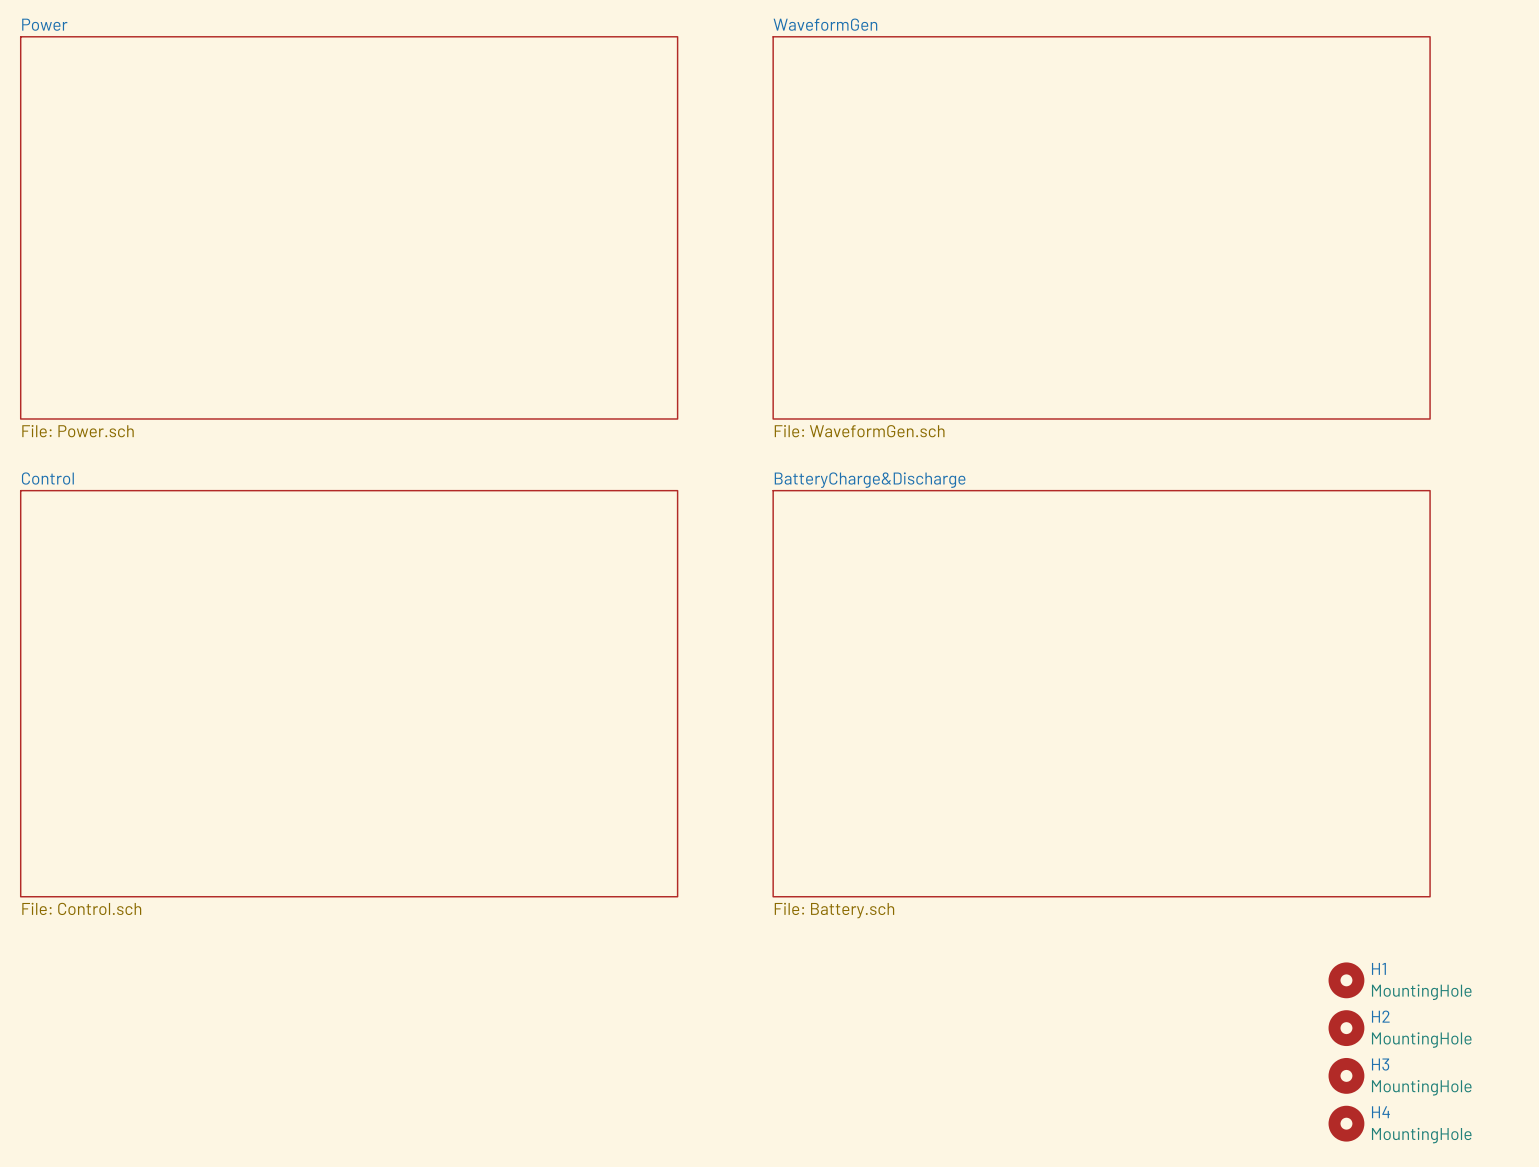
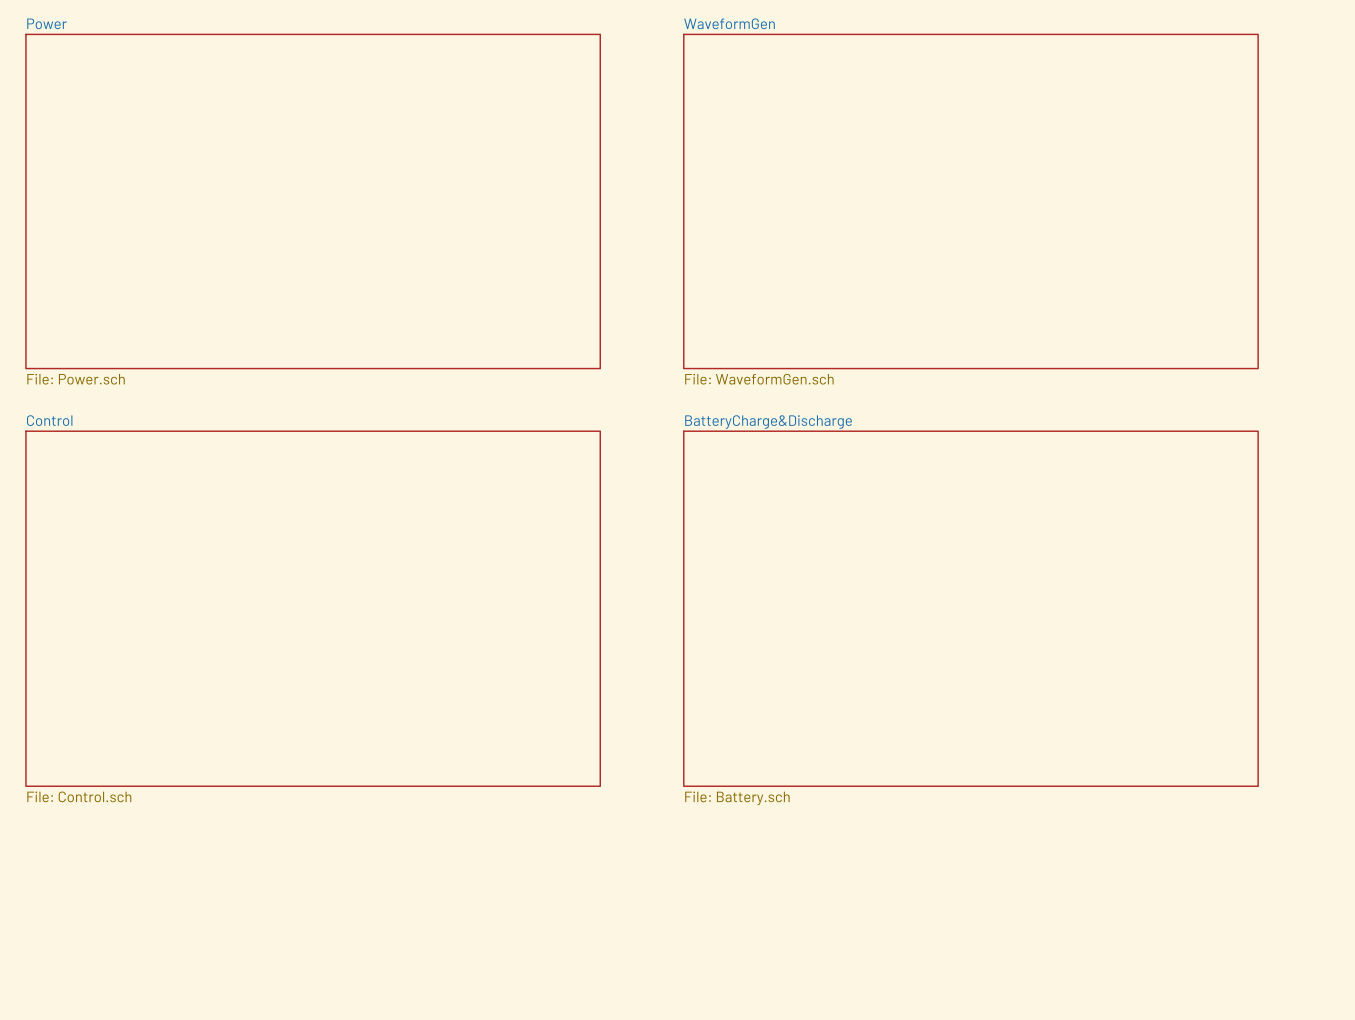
H1: MountingHole (1346, 980) -> none
H2: MountingHole (1346, 1028) -> none
H3: MountingHole (1346, 1075) -> none
H4: MountingHole (1346, 1123) -> none

